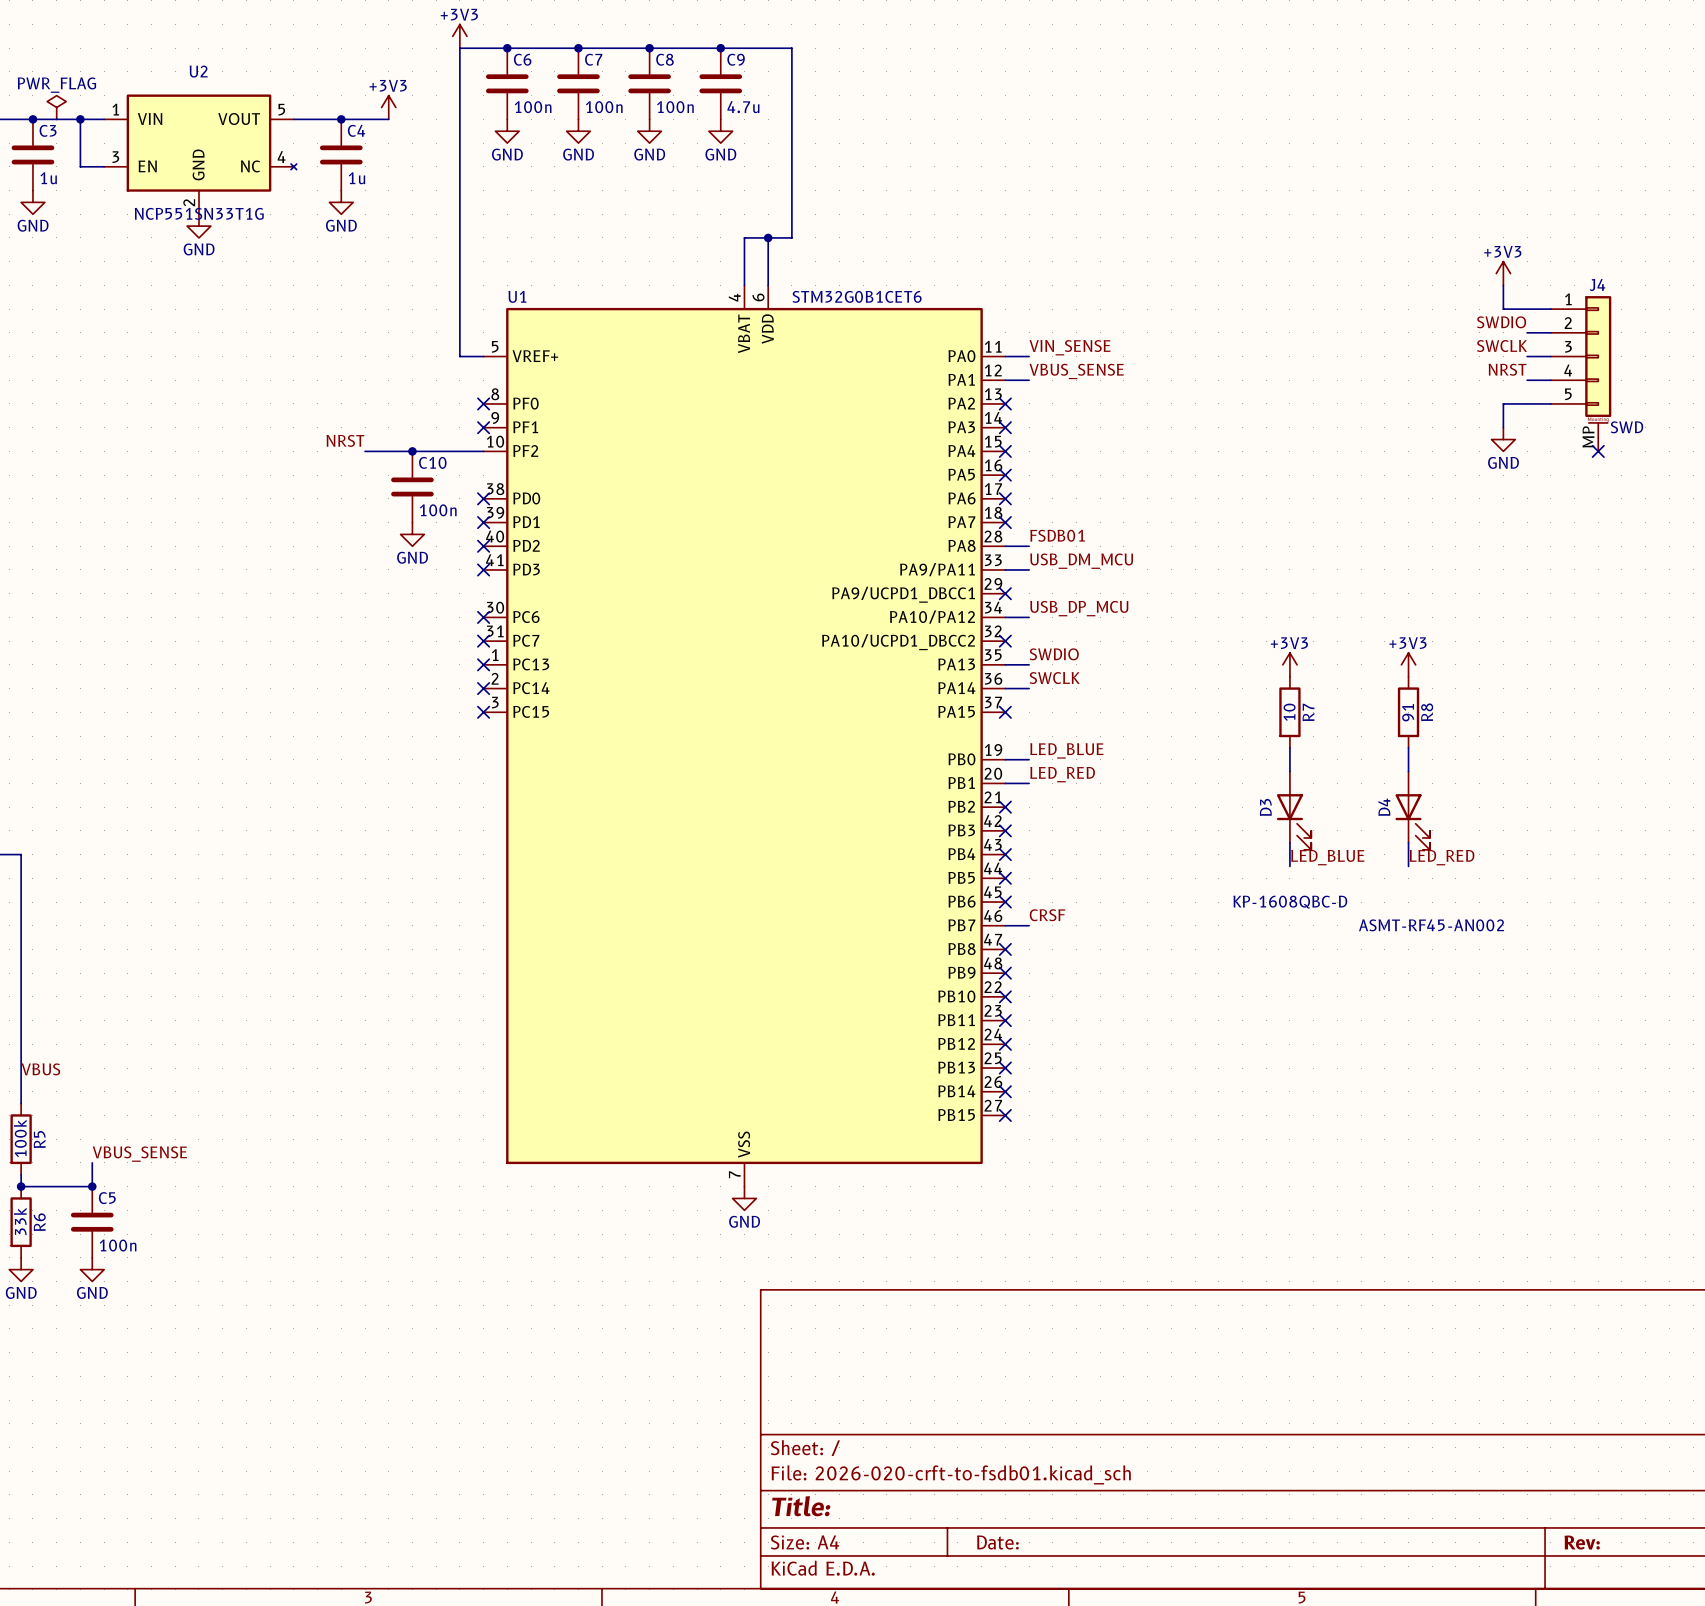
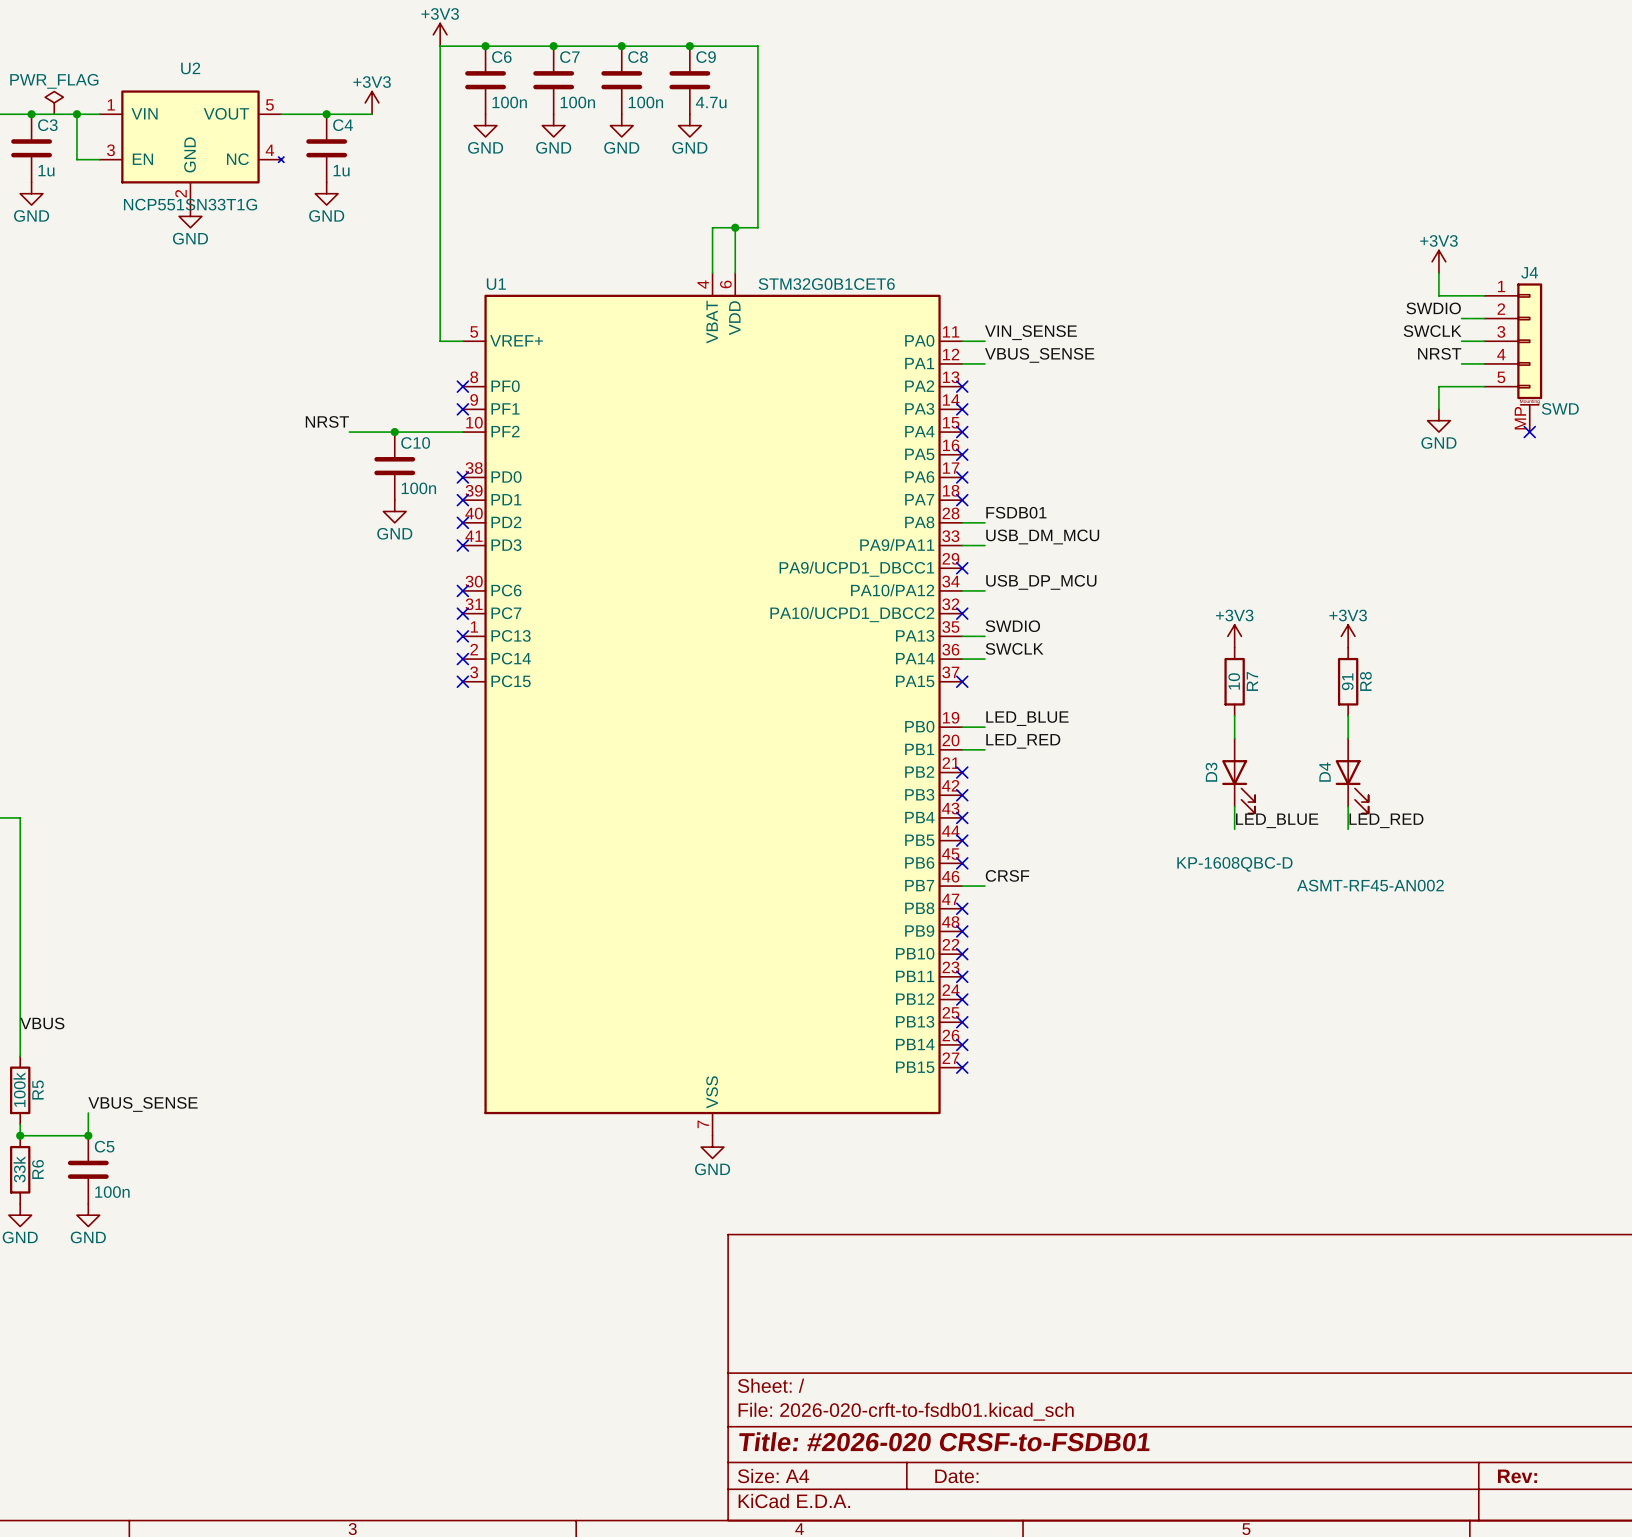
title block: Title: (801, 1506) -> Title: #2026-020 CRSF-to-FSDB01 (944, 1441)

